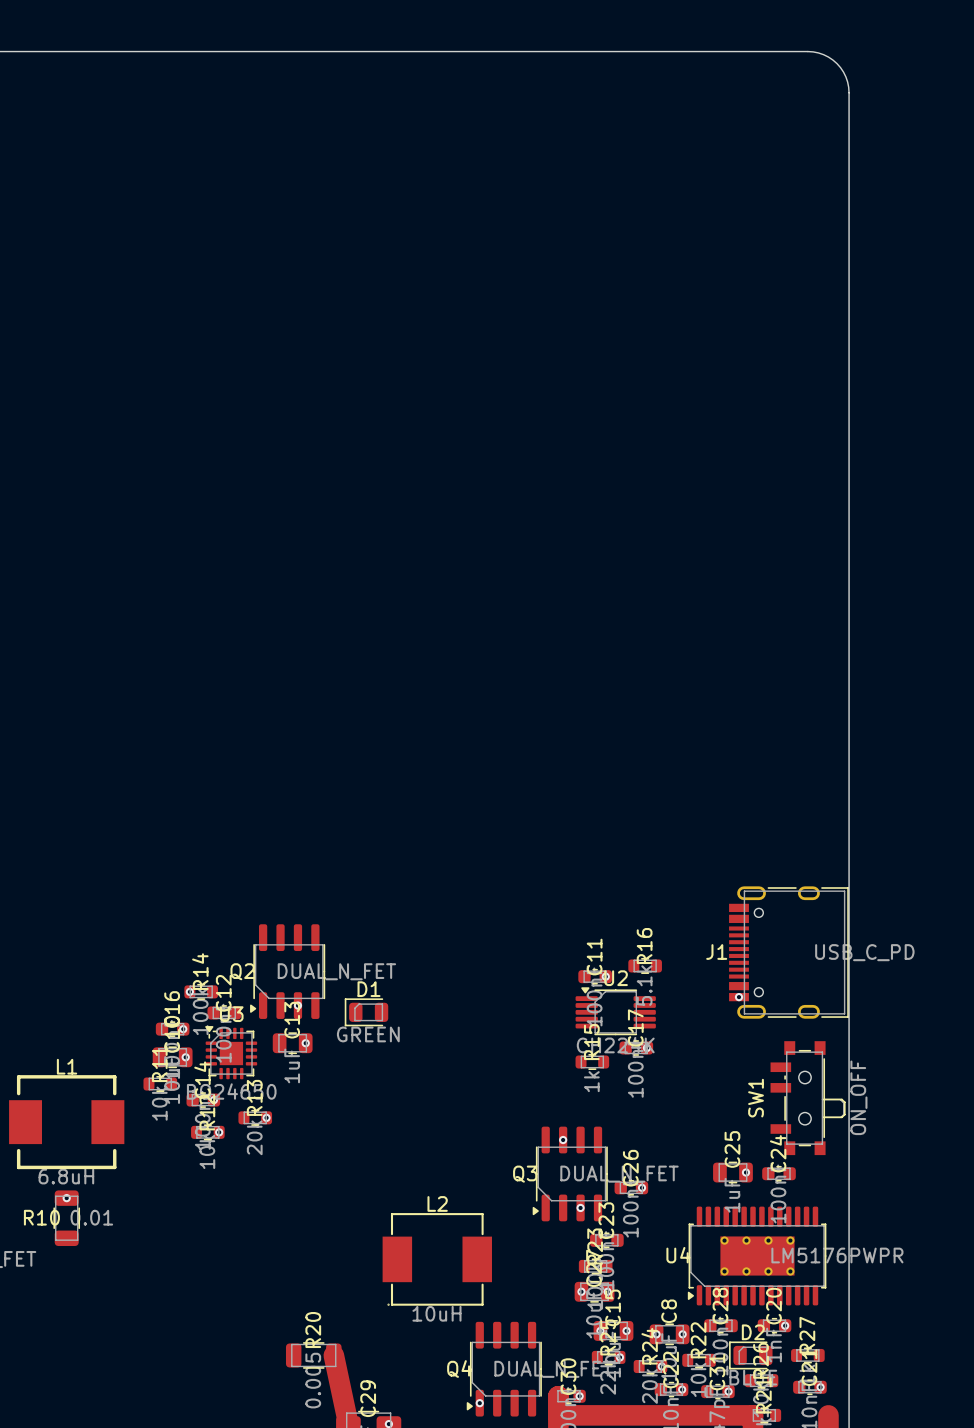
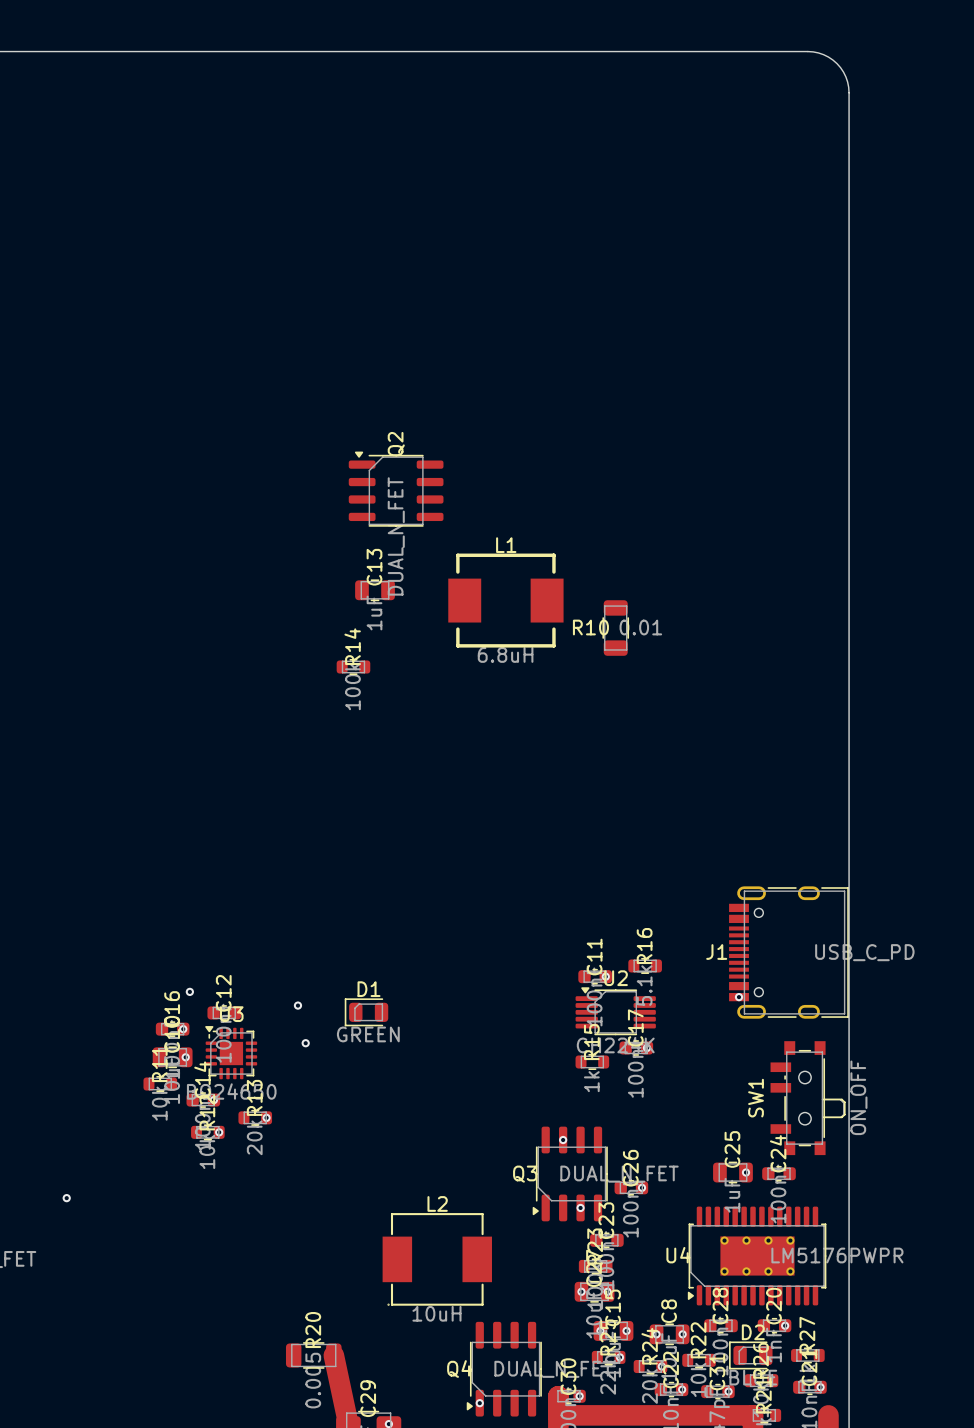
Q2 rotation: 0° (287, 971) -> 90° clockwise (396, 489)
Q2 position: (287, 971) -> (396, 489)
R14 position: (201, 991) -> (353, 666)
C13 position: (292, 1043) -> (375, 590)
L1 position: (66, 1122) -> (505, 600)
R10 position: (66, 1218) -> (615, 628)

